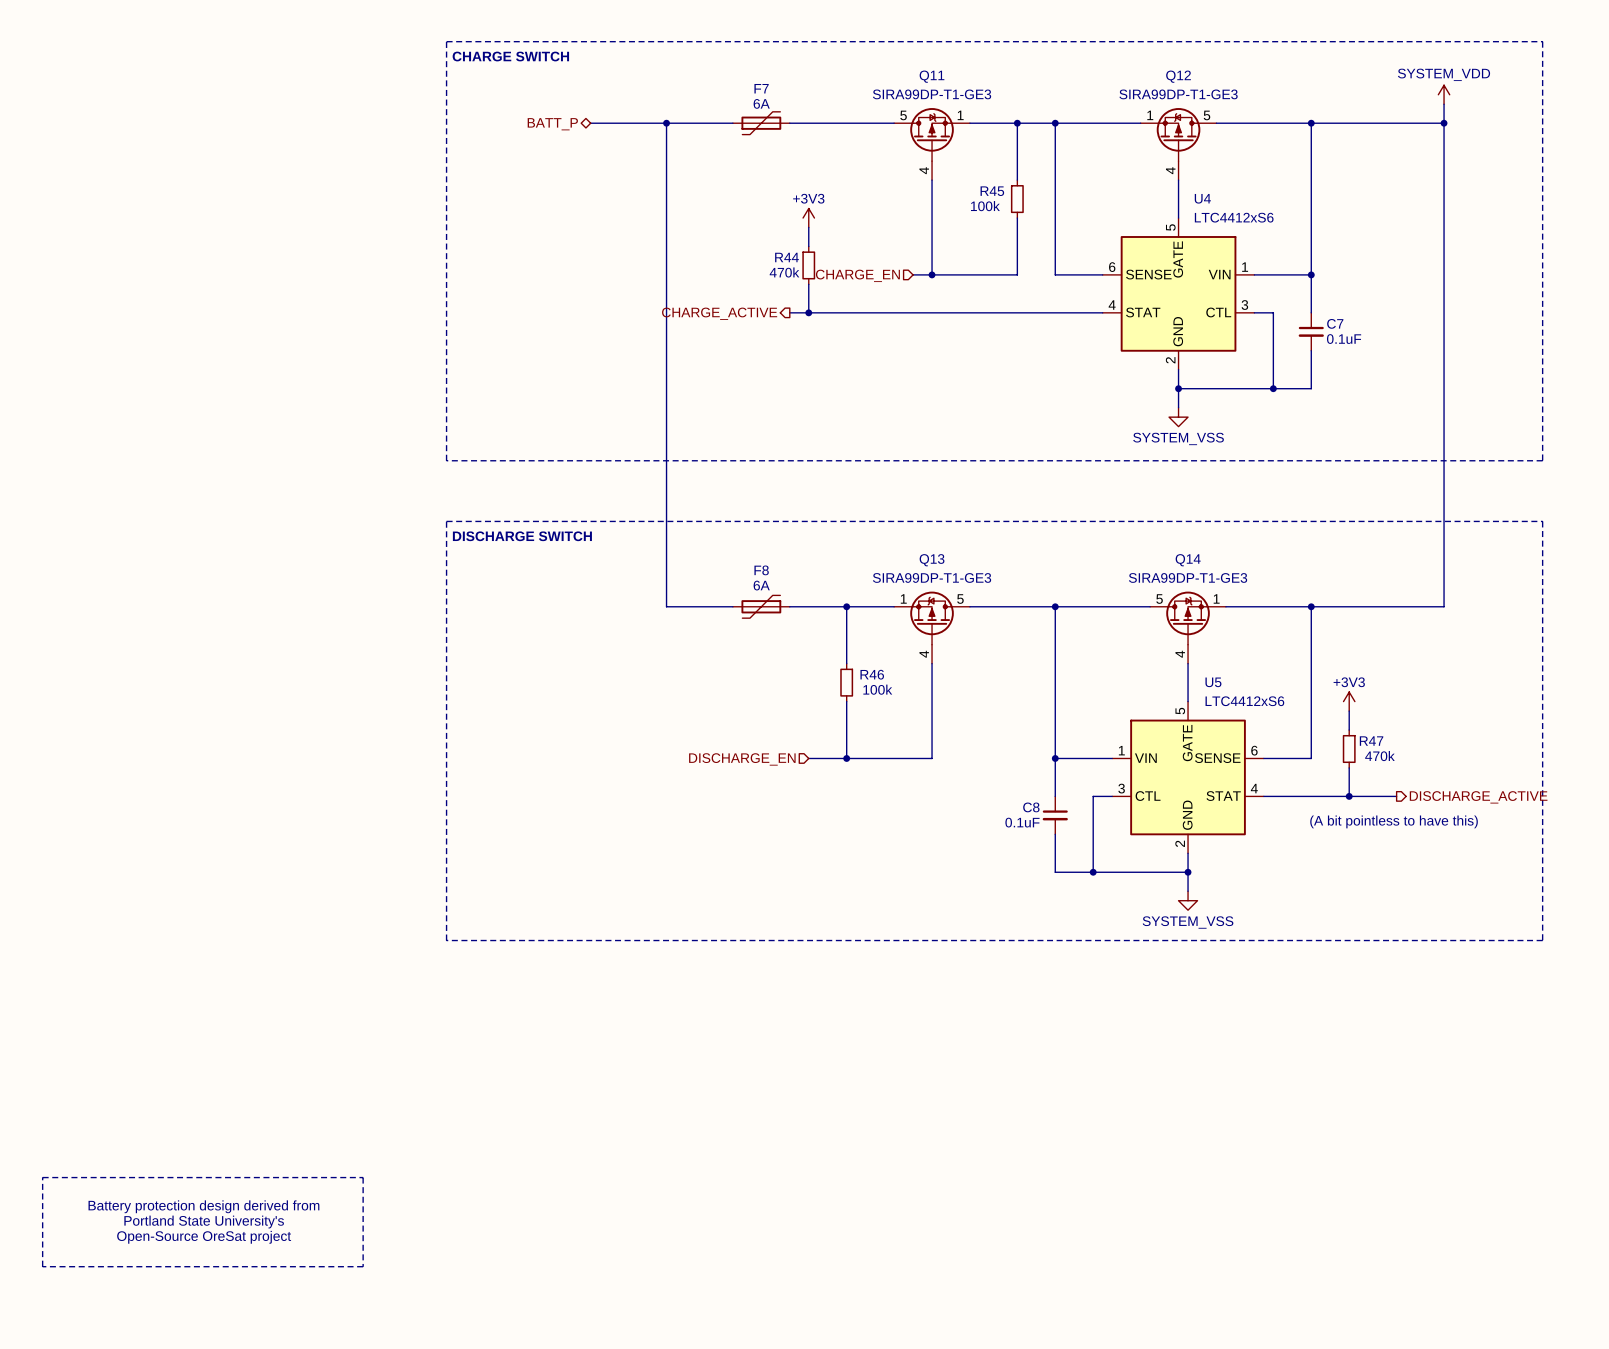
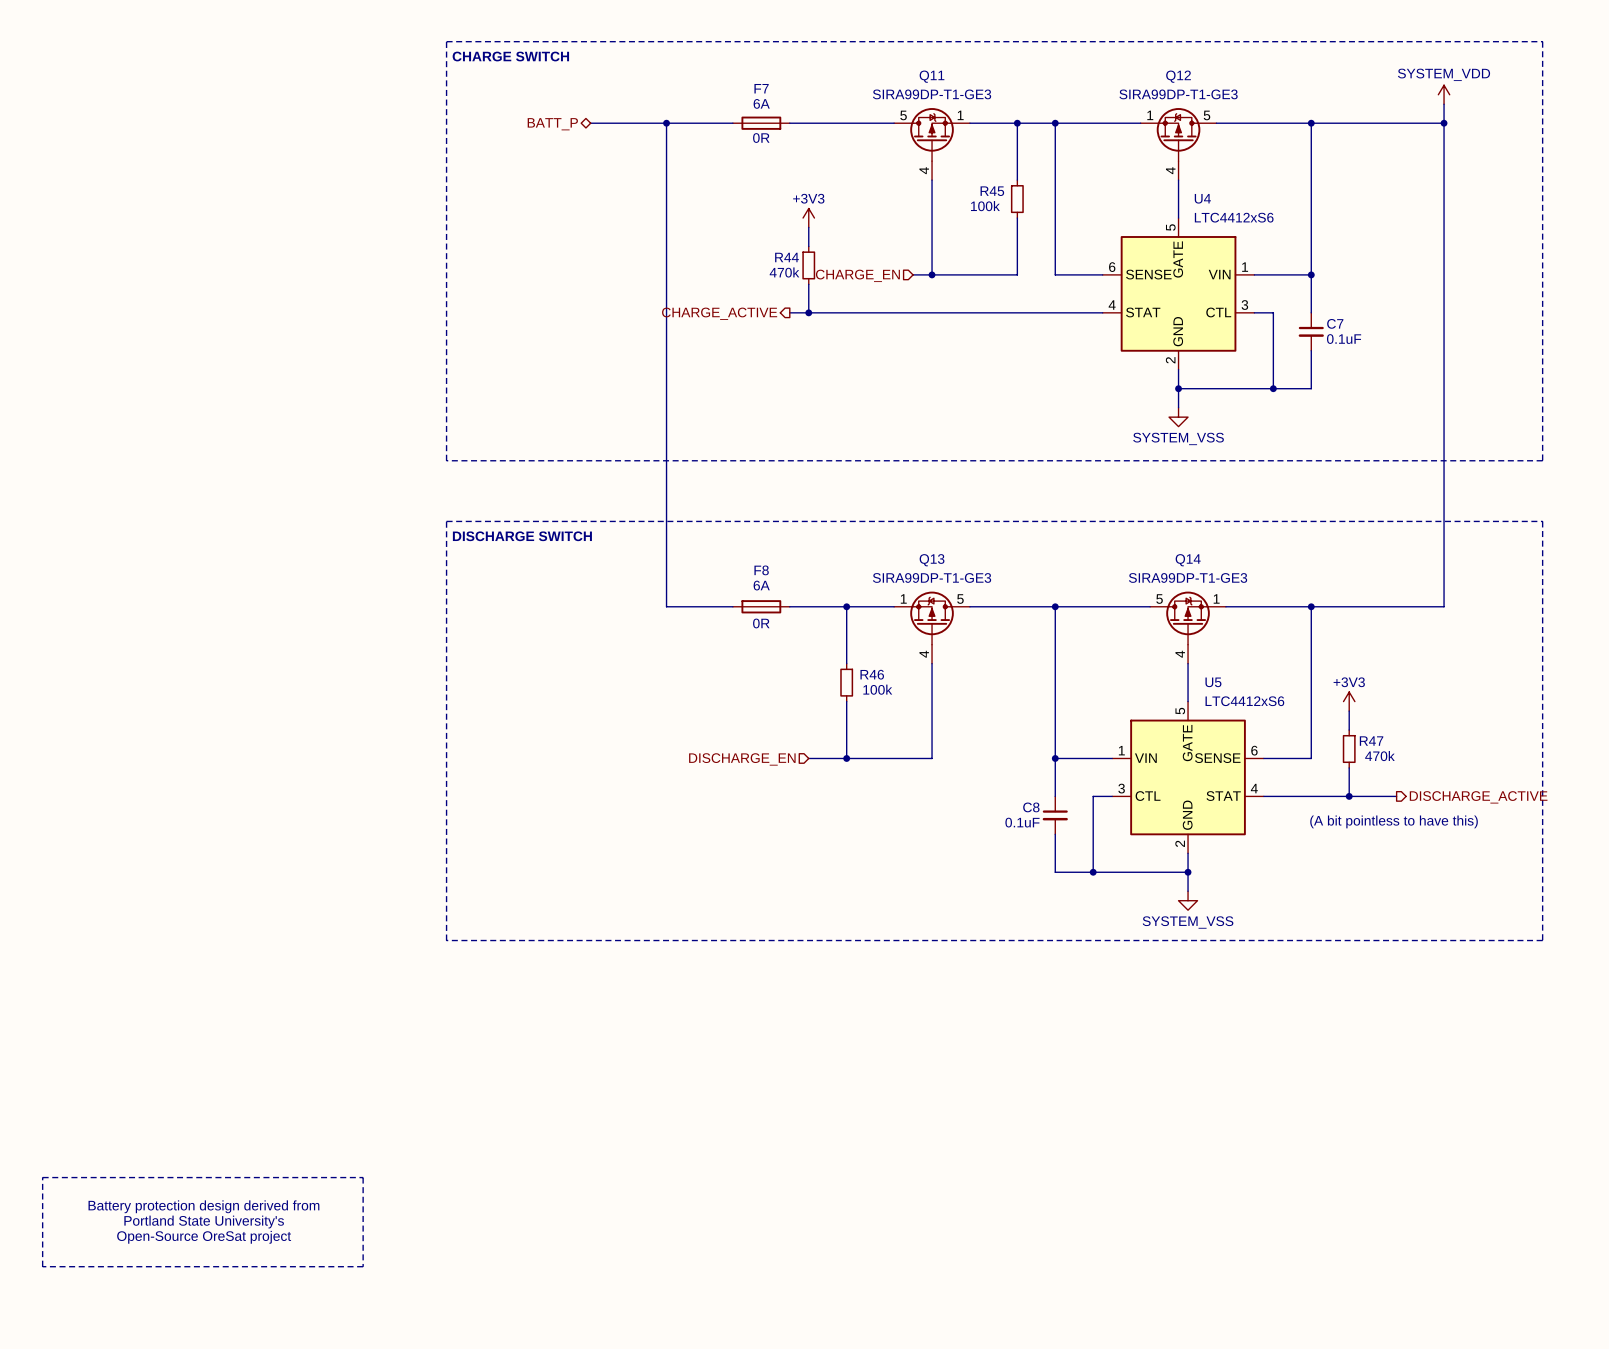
F7 symbol: [732, 111, 790, 135] -> [732, 116, 790, 130]
F7 text: none -> 0R (761, 138)
F8 symbol: [732, 595, 790, 619] -> [732, 600, 790, 614]
F8 text: none -> 0R (761, 623)

